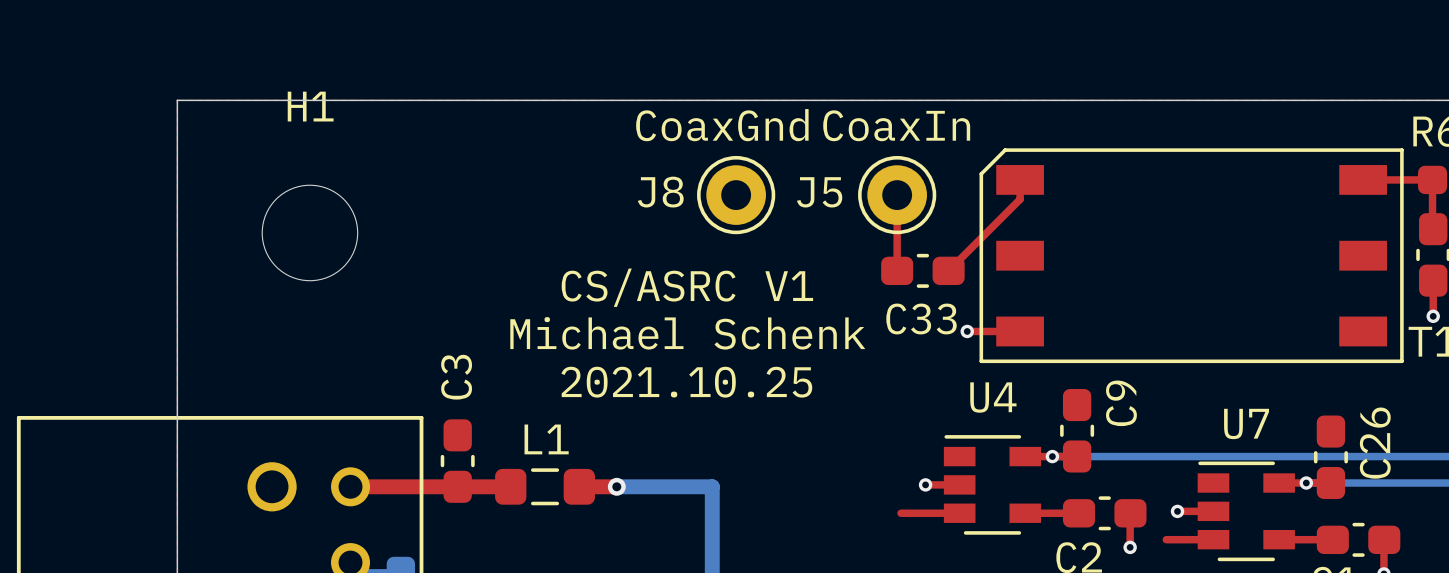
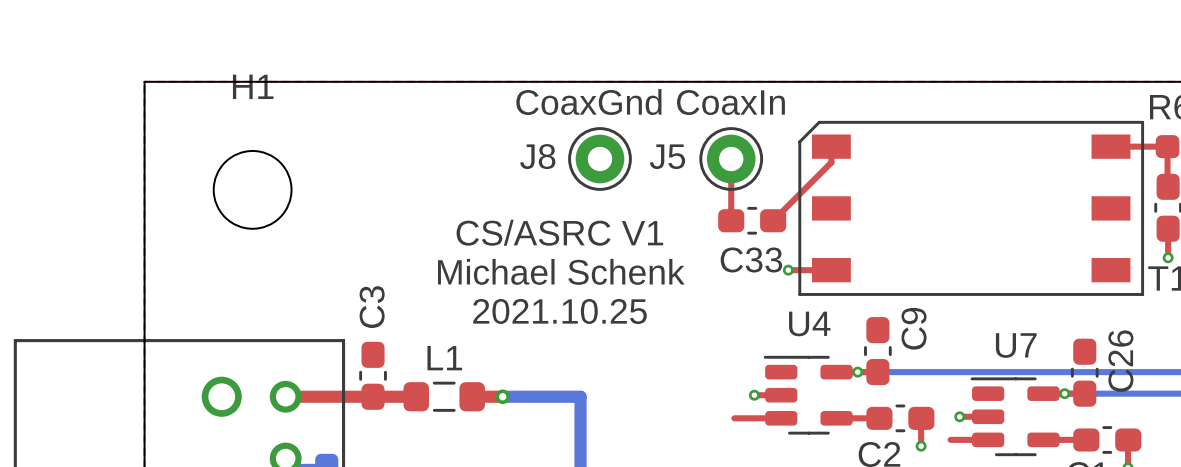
U4 footprint: [943, 435, 1042, 535] -> [763, 355, 853, 435]
U7 footprint: [1197, 461, 1295, 562] -> [970, 377, 1060, 457]

